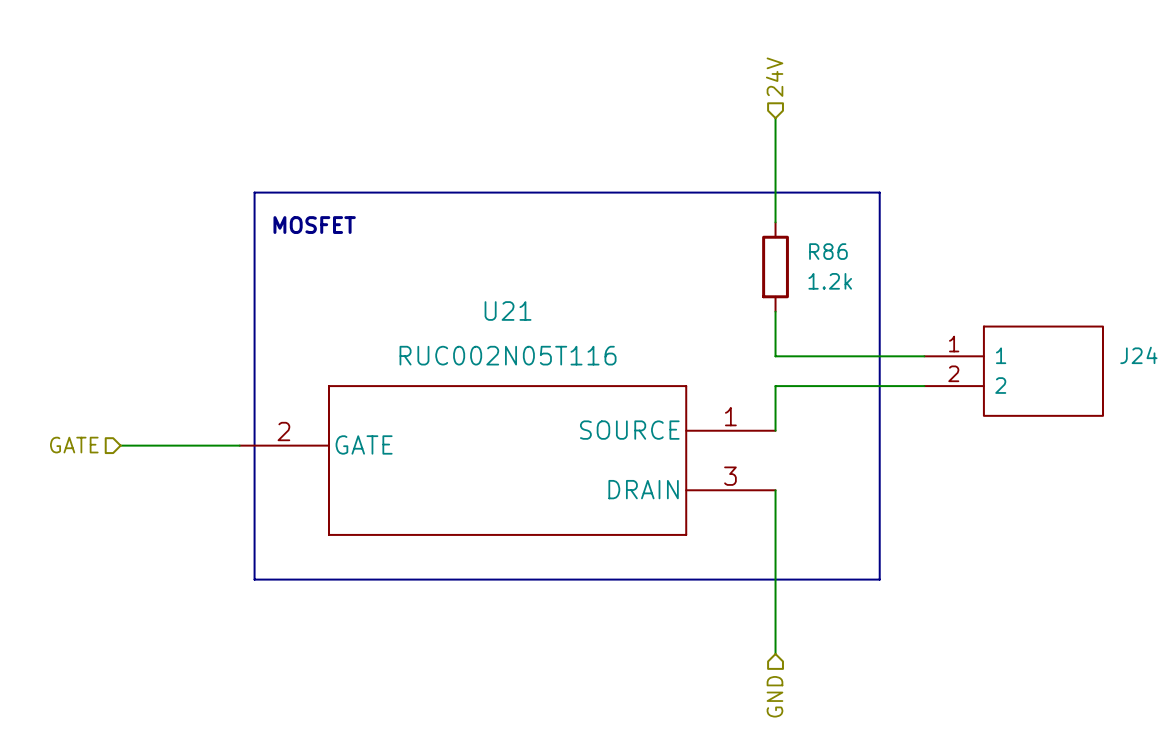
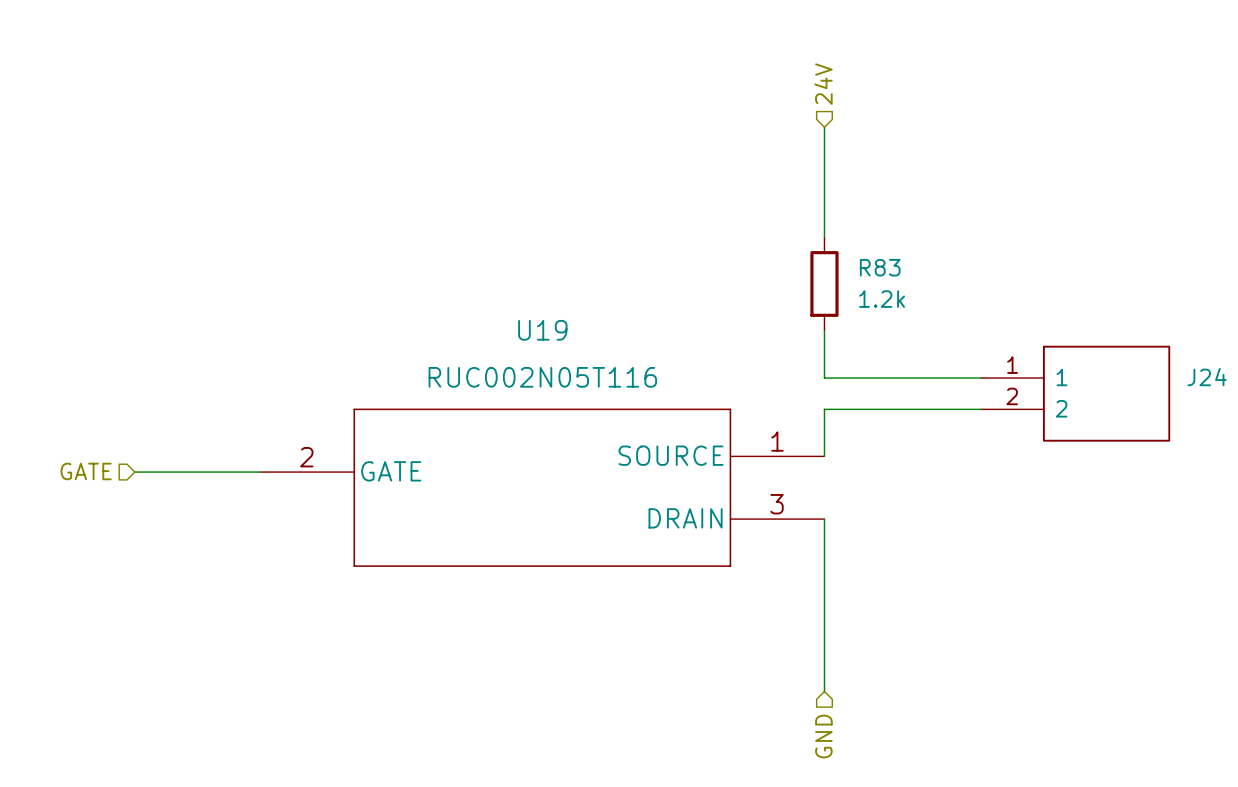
line: (254, 192) (254, 579) (879, 579) (879, 192) (254, 192) -> none
text: MOSFET (314, 225) -> none
R86 name: R86 (828, 251) -> R83 (880, 267)
U21 name: U21 (508, 310) -> U19 (542, 330)

